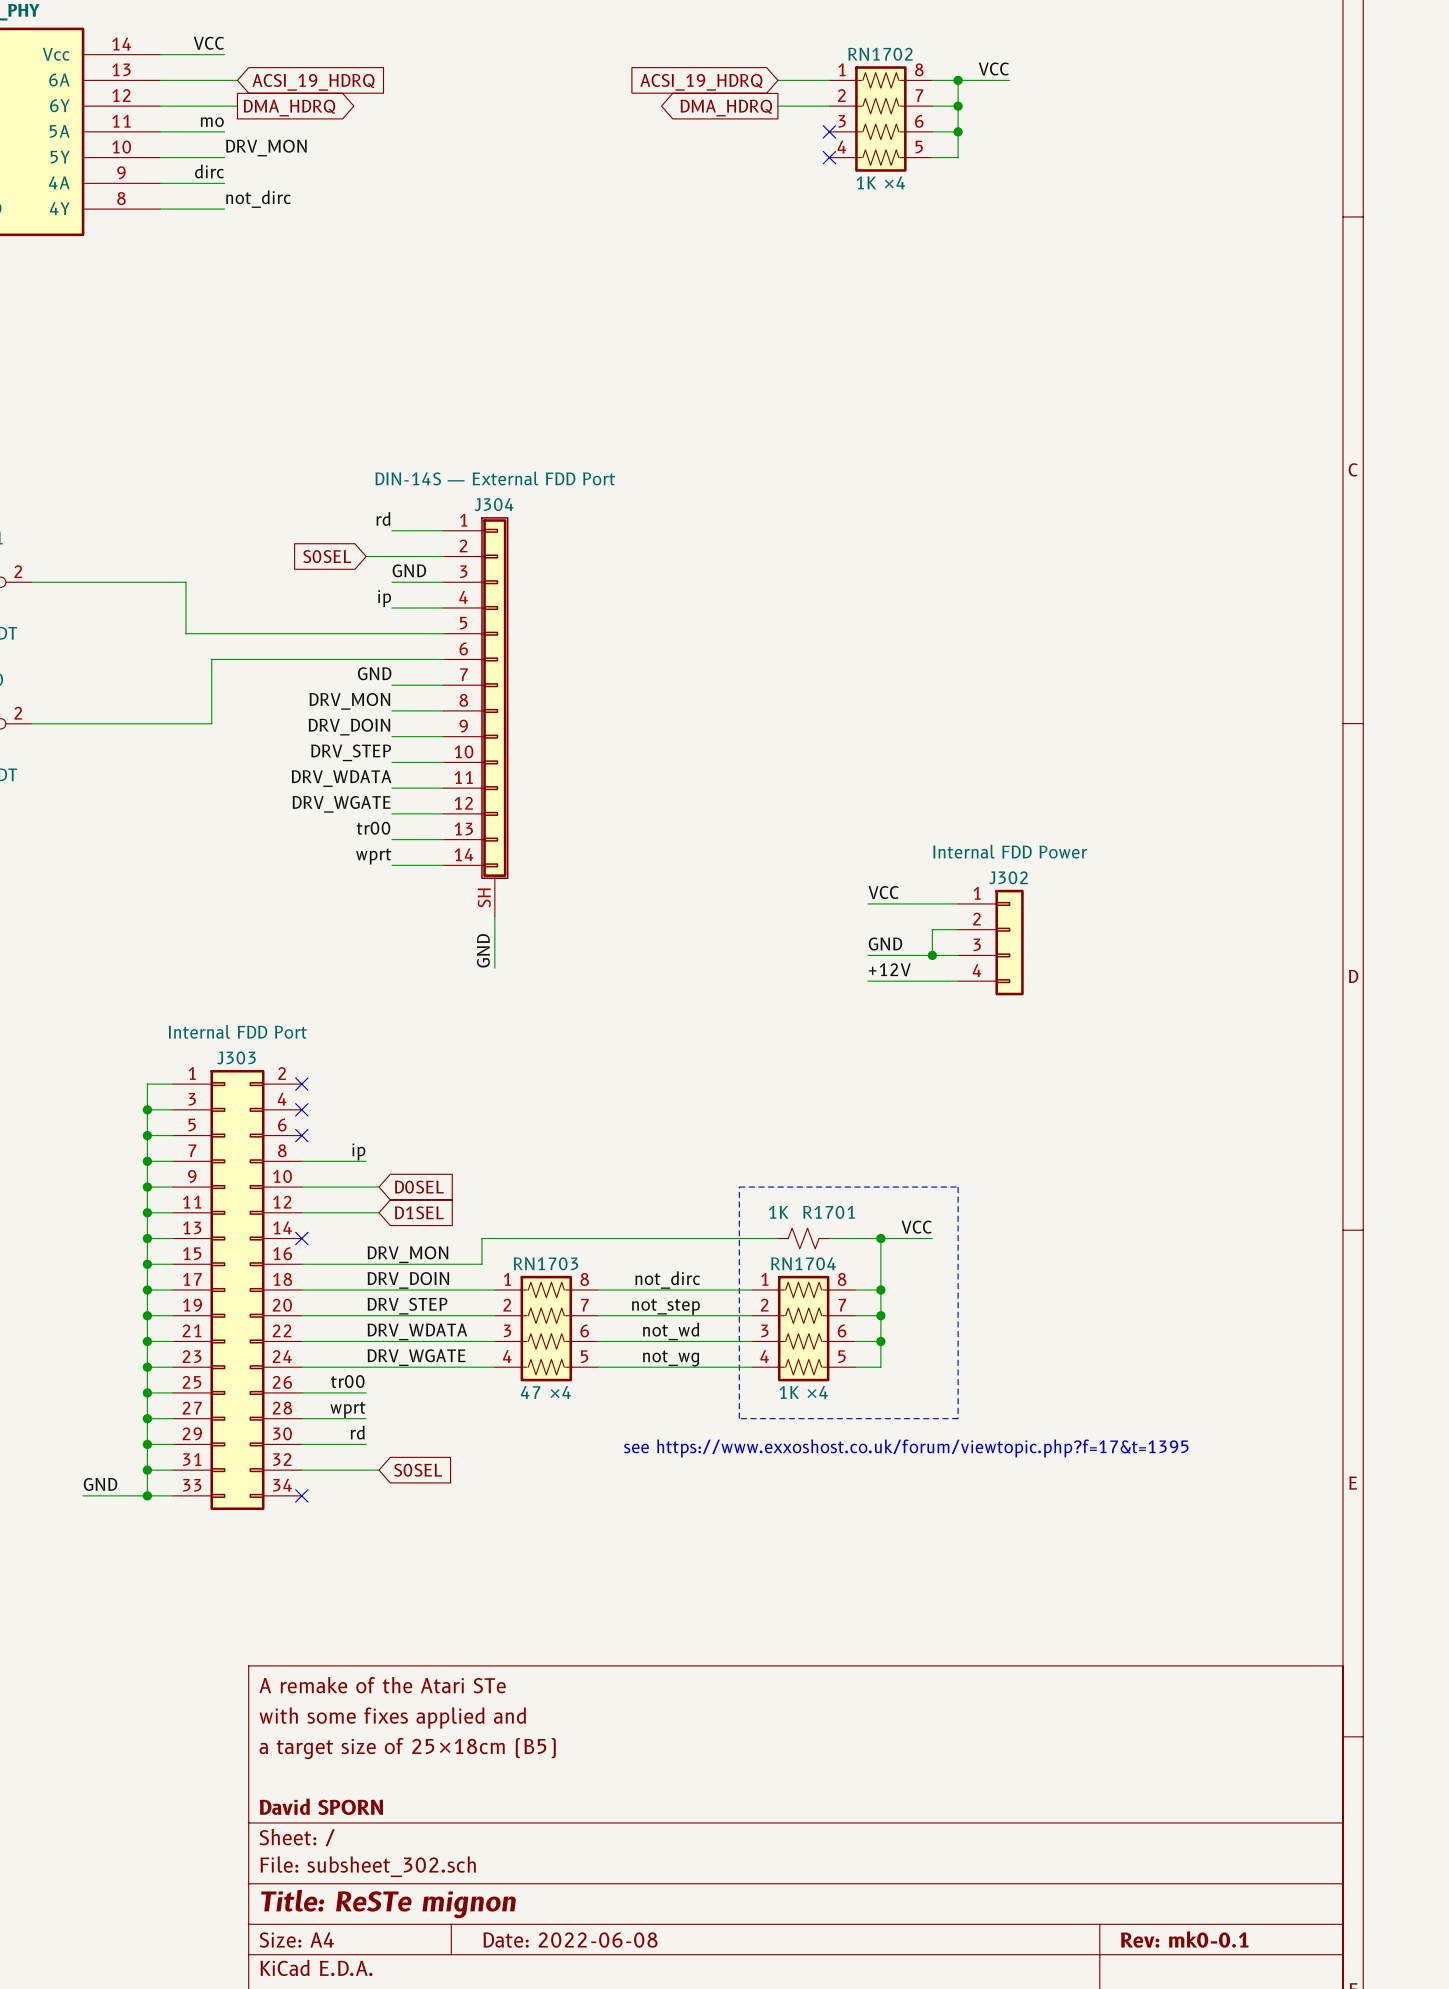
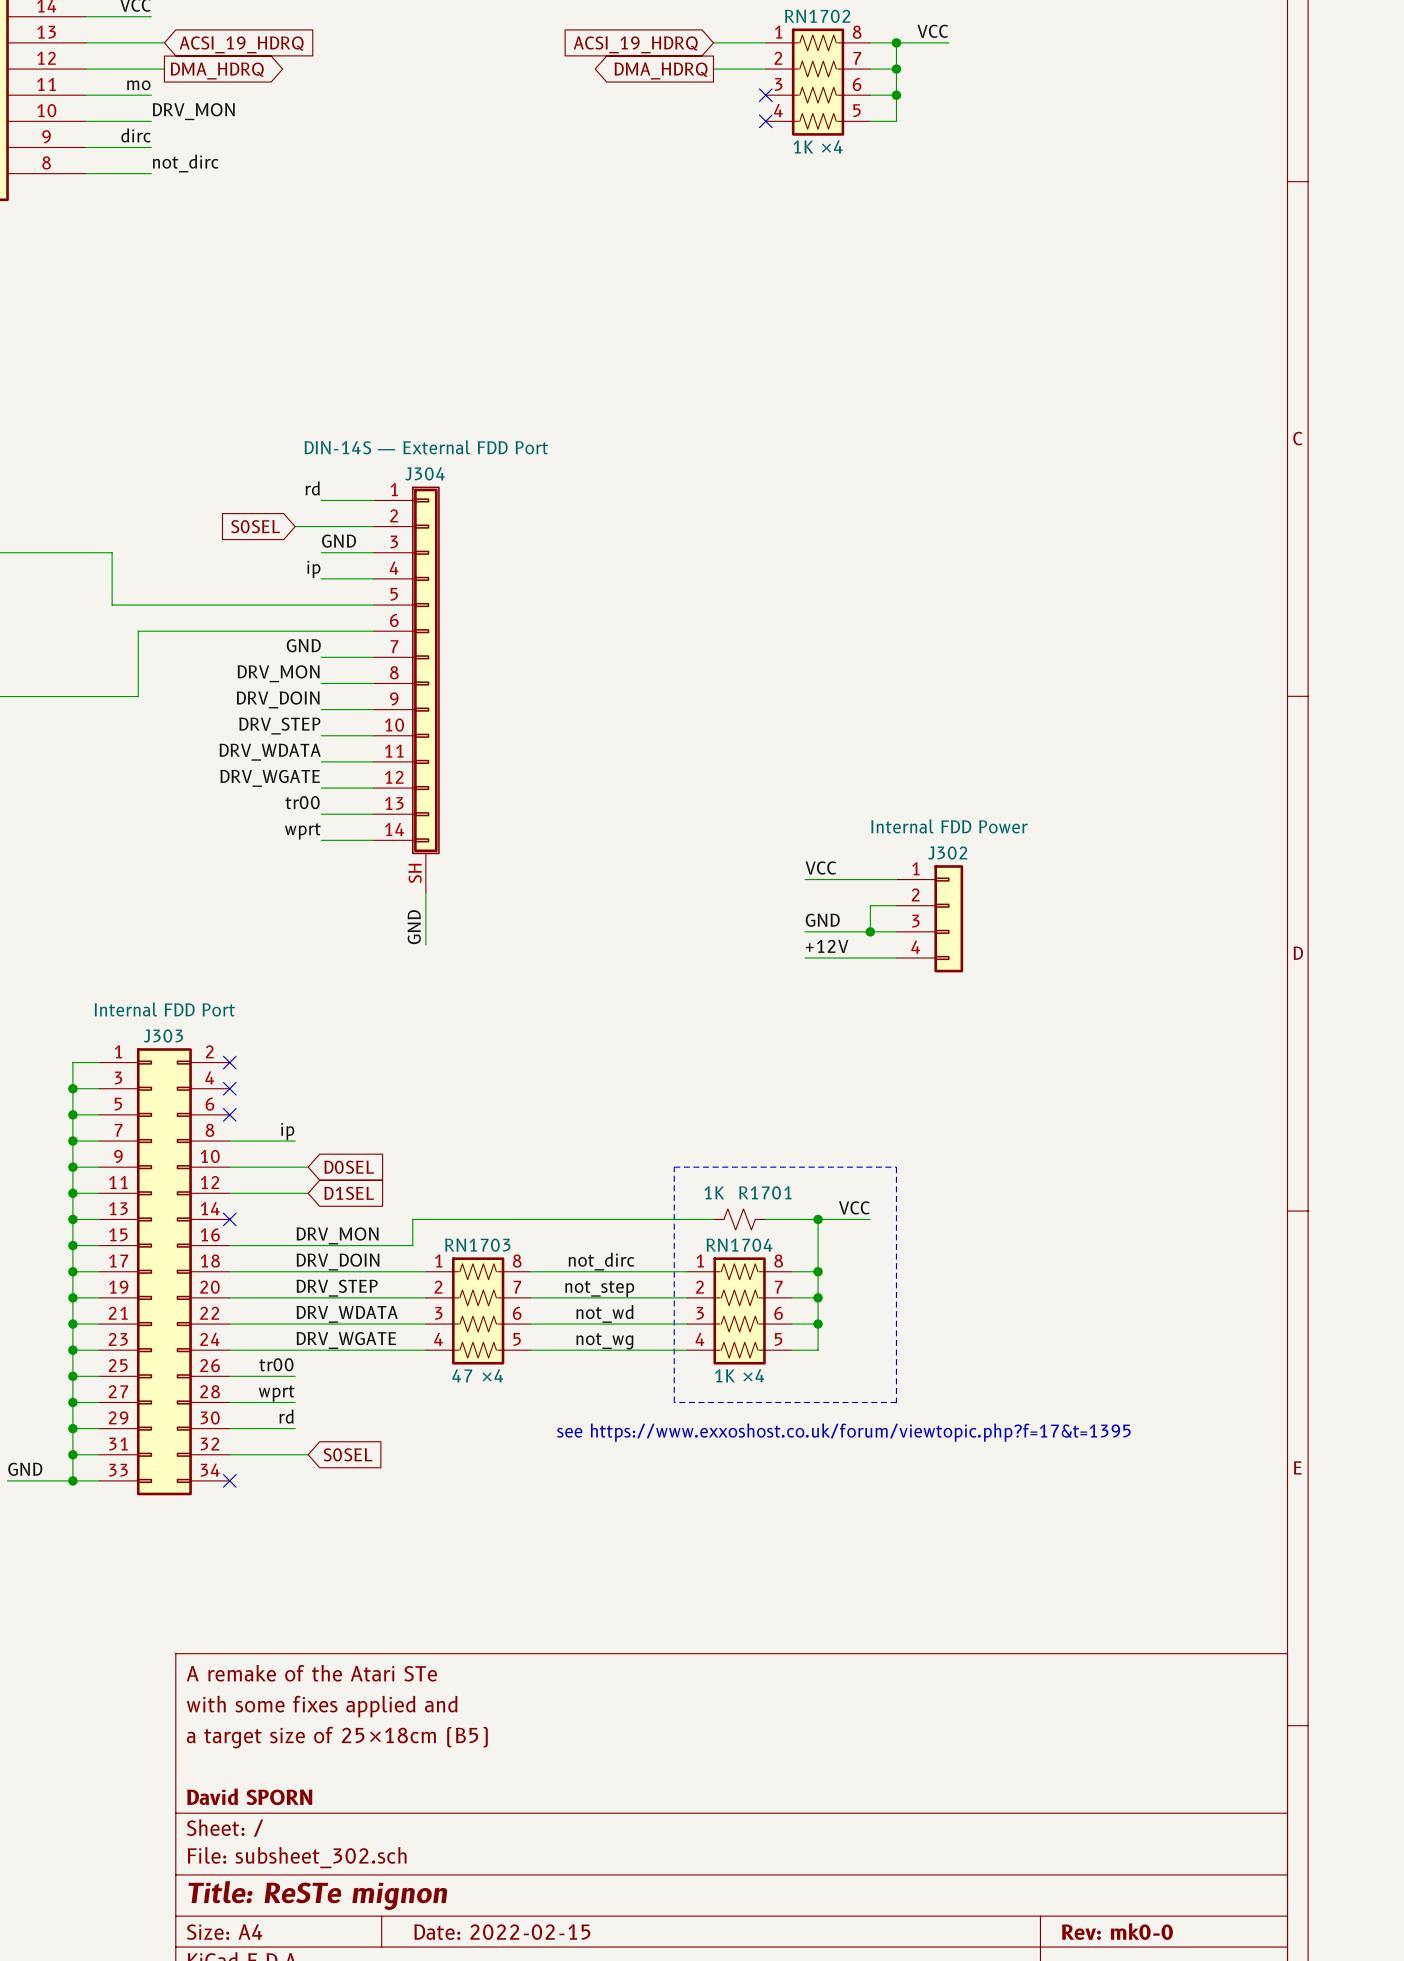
title block: Rev: mk0-0.1 (1184, 1939) -> Rev: mk0-0 (1117, 1931)
title block: Date: 2022-06-08 (570, 1940) -> Date: 2022-02-15 (502, 1932)

